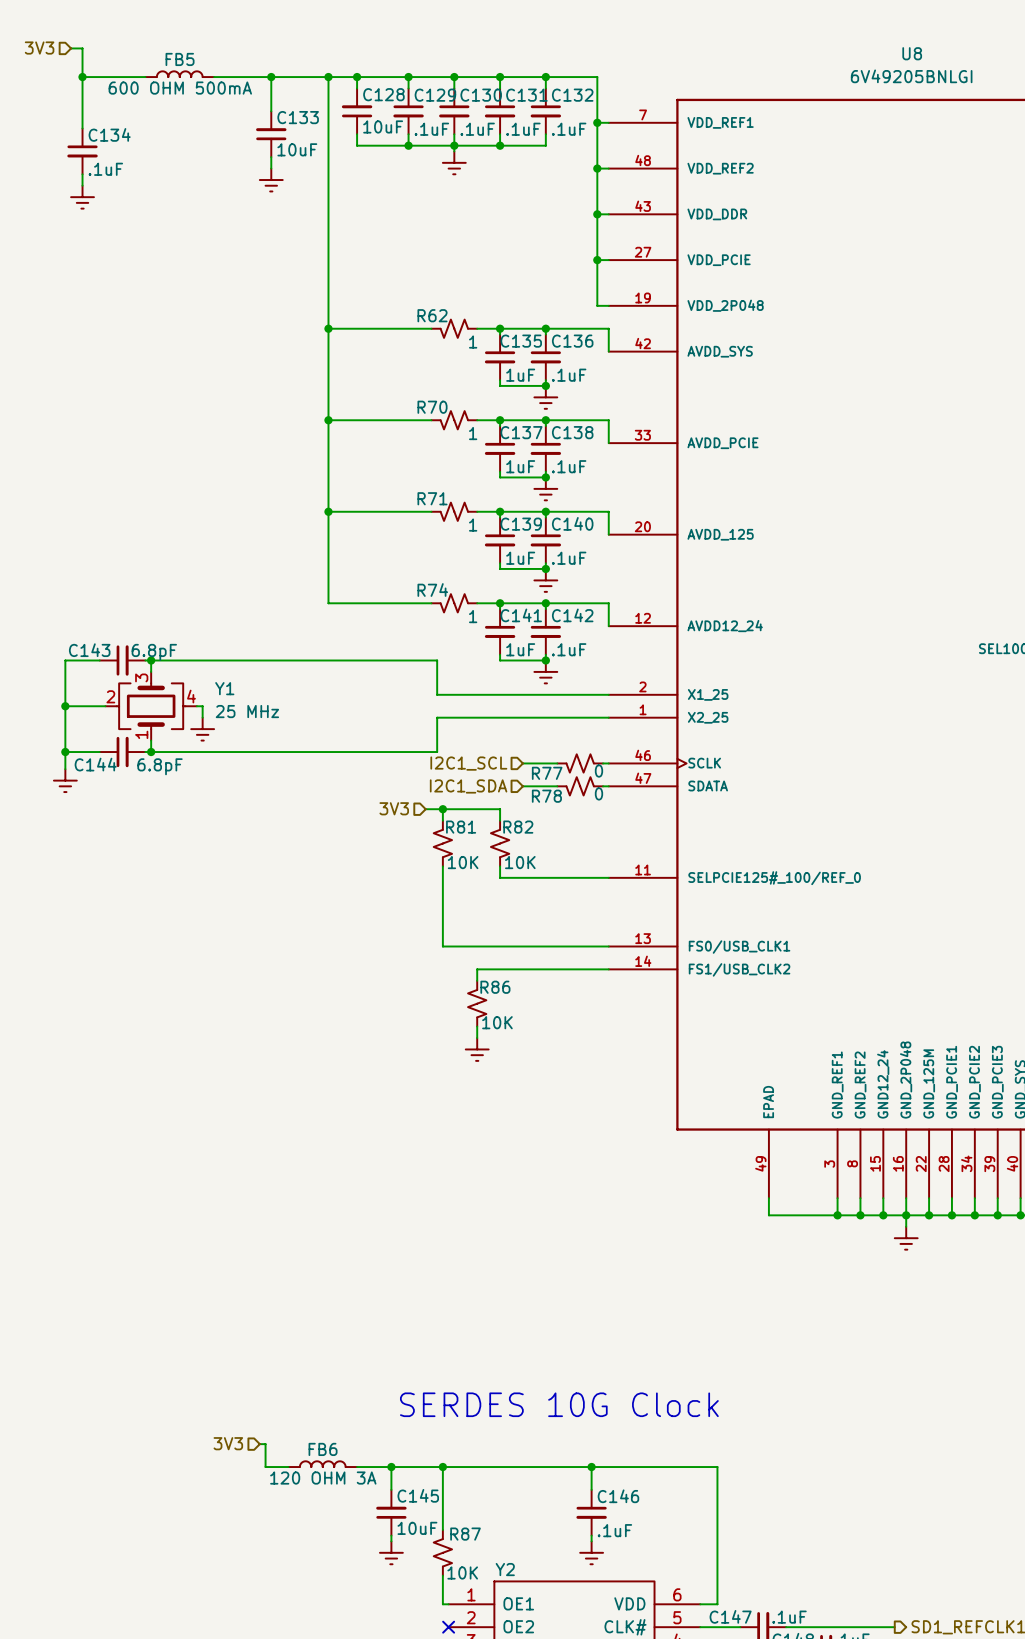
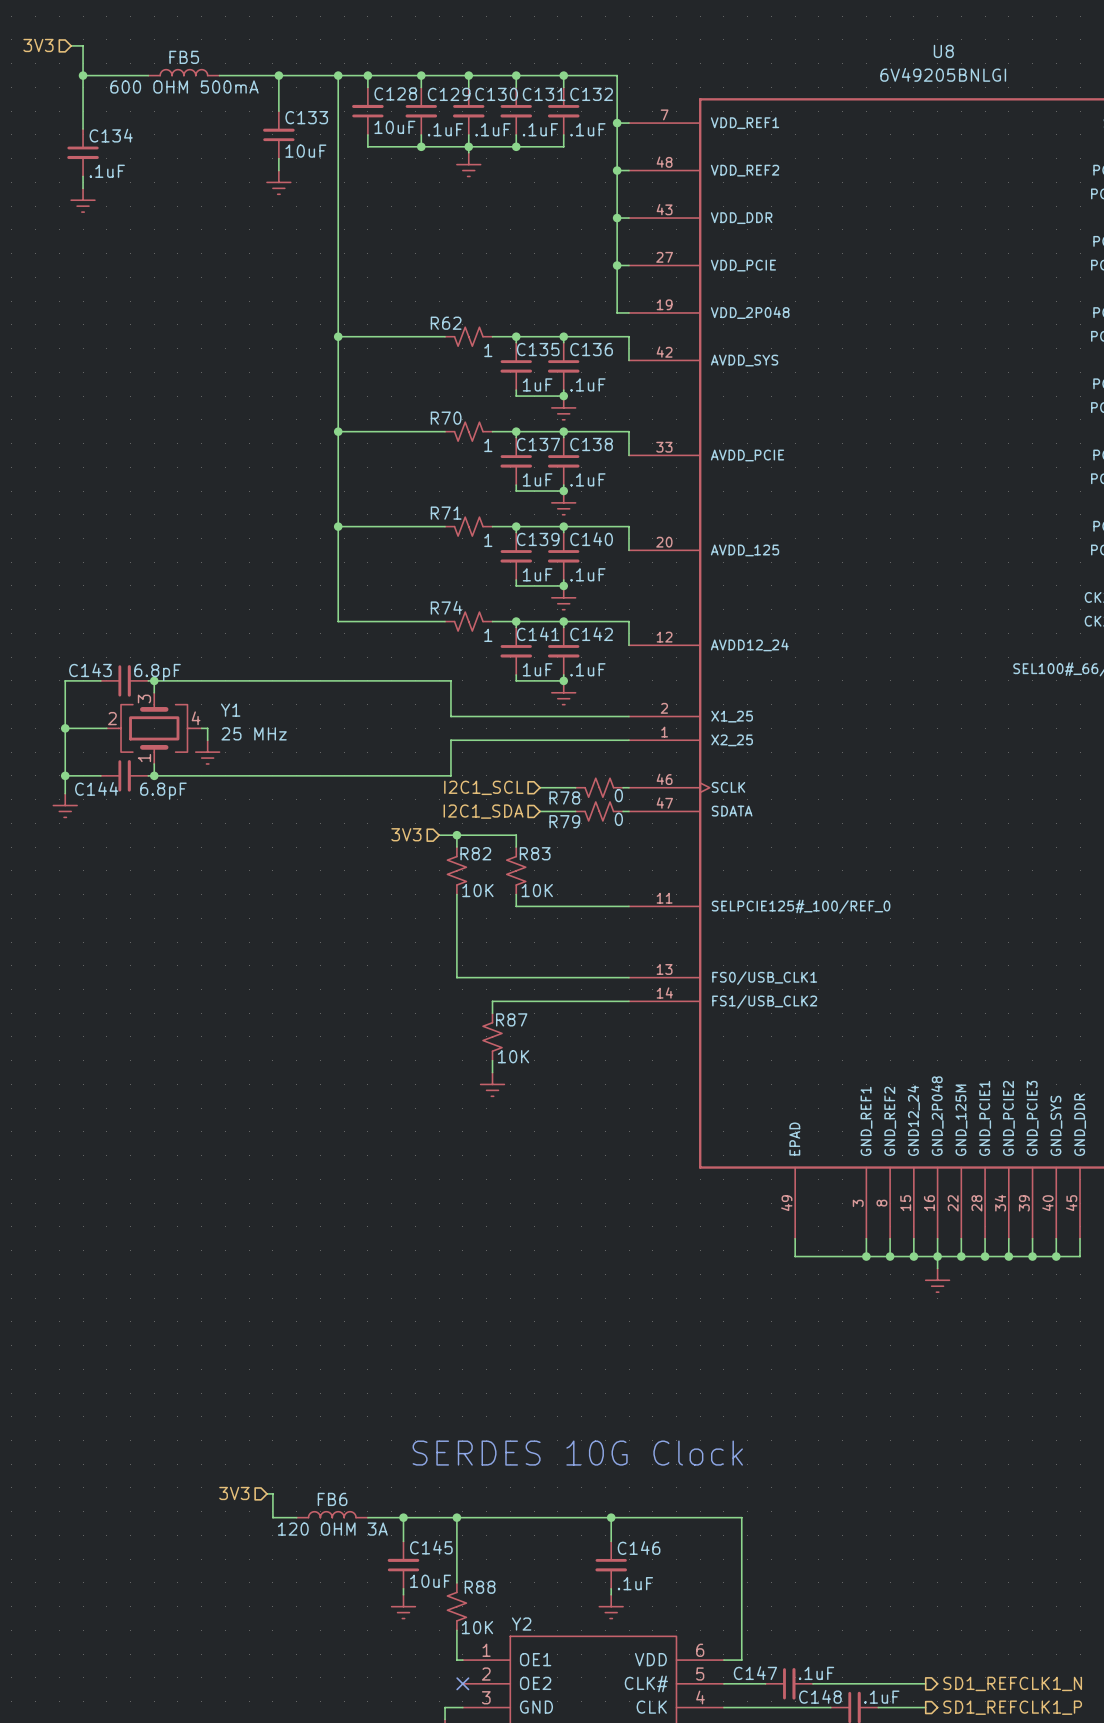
R77 name: R77 (547, 773) -> R78 (564, 797)
R78 name: R78 (546, 796) -> R79 (564, 821)
R81 name: R81 (461, 827) -> R82 (475, 853)
R82 name: R82 (518, 827) -> R83 (535, 853)
R86 name: R86 (495, 987) -> R87 (511, 1019)
R87 name: R87 (465, 1534) -> R88 (480, 1587)

